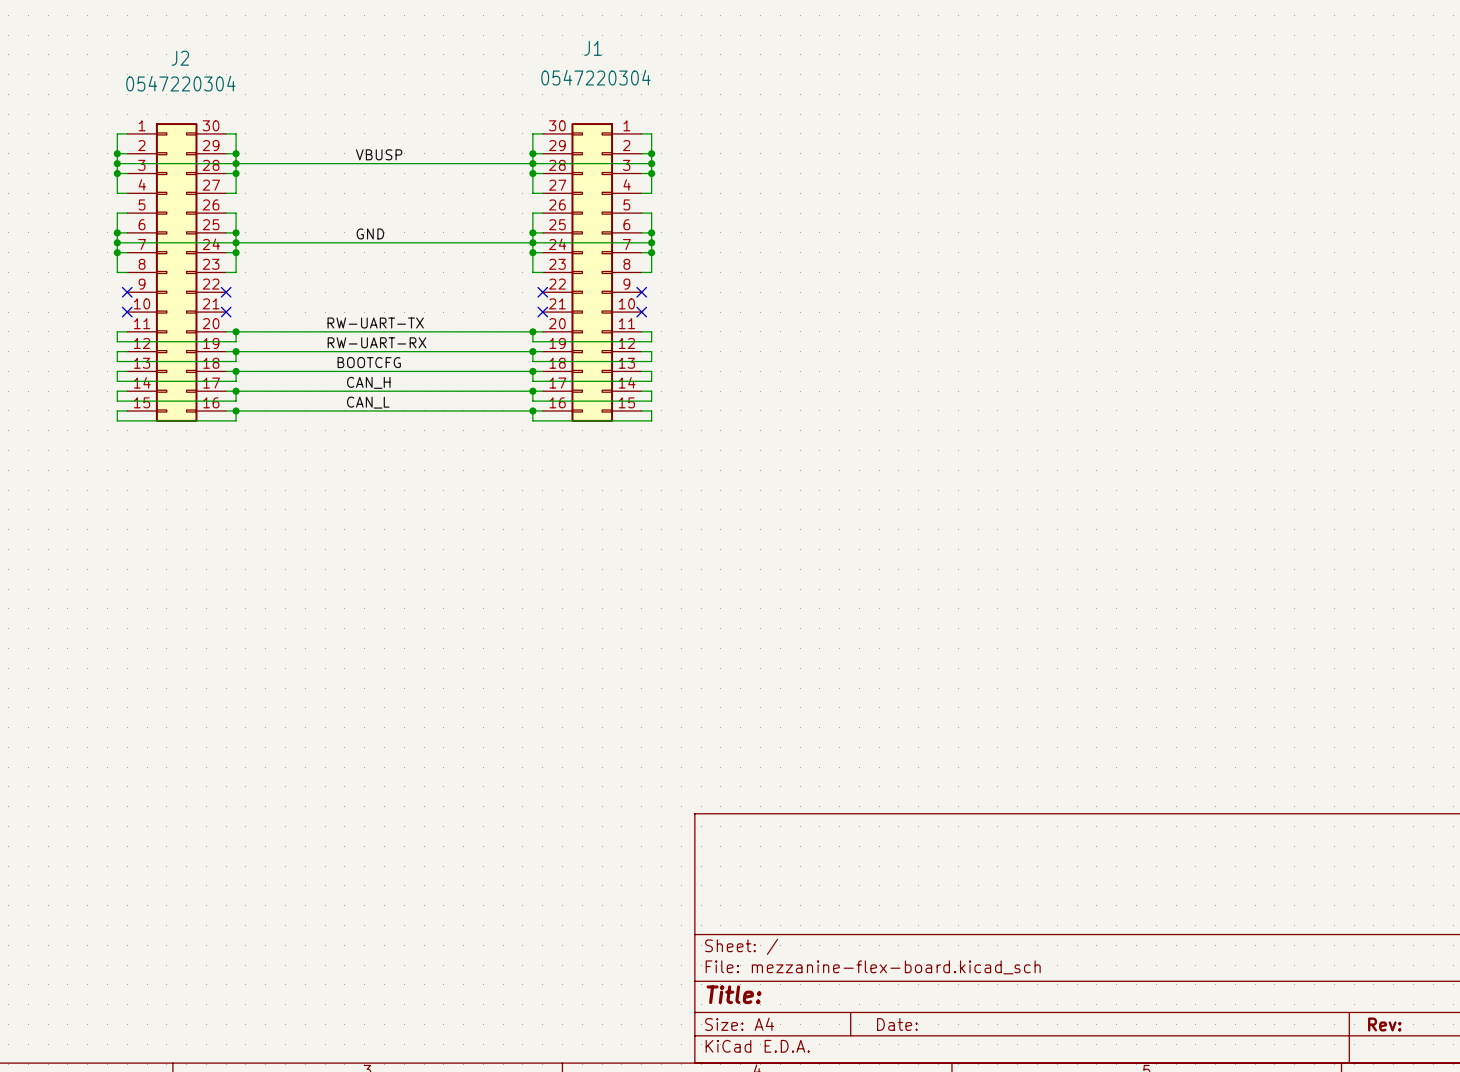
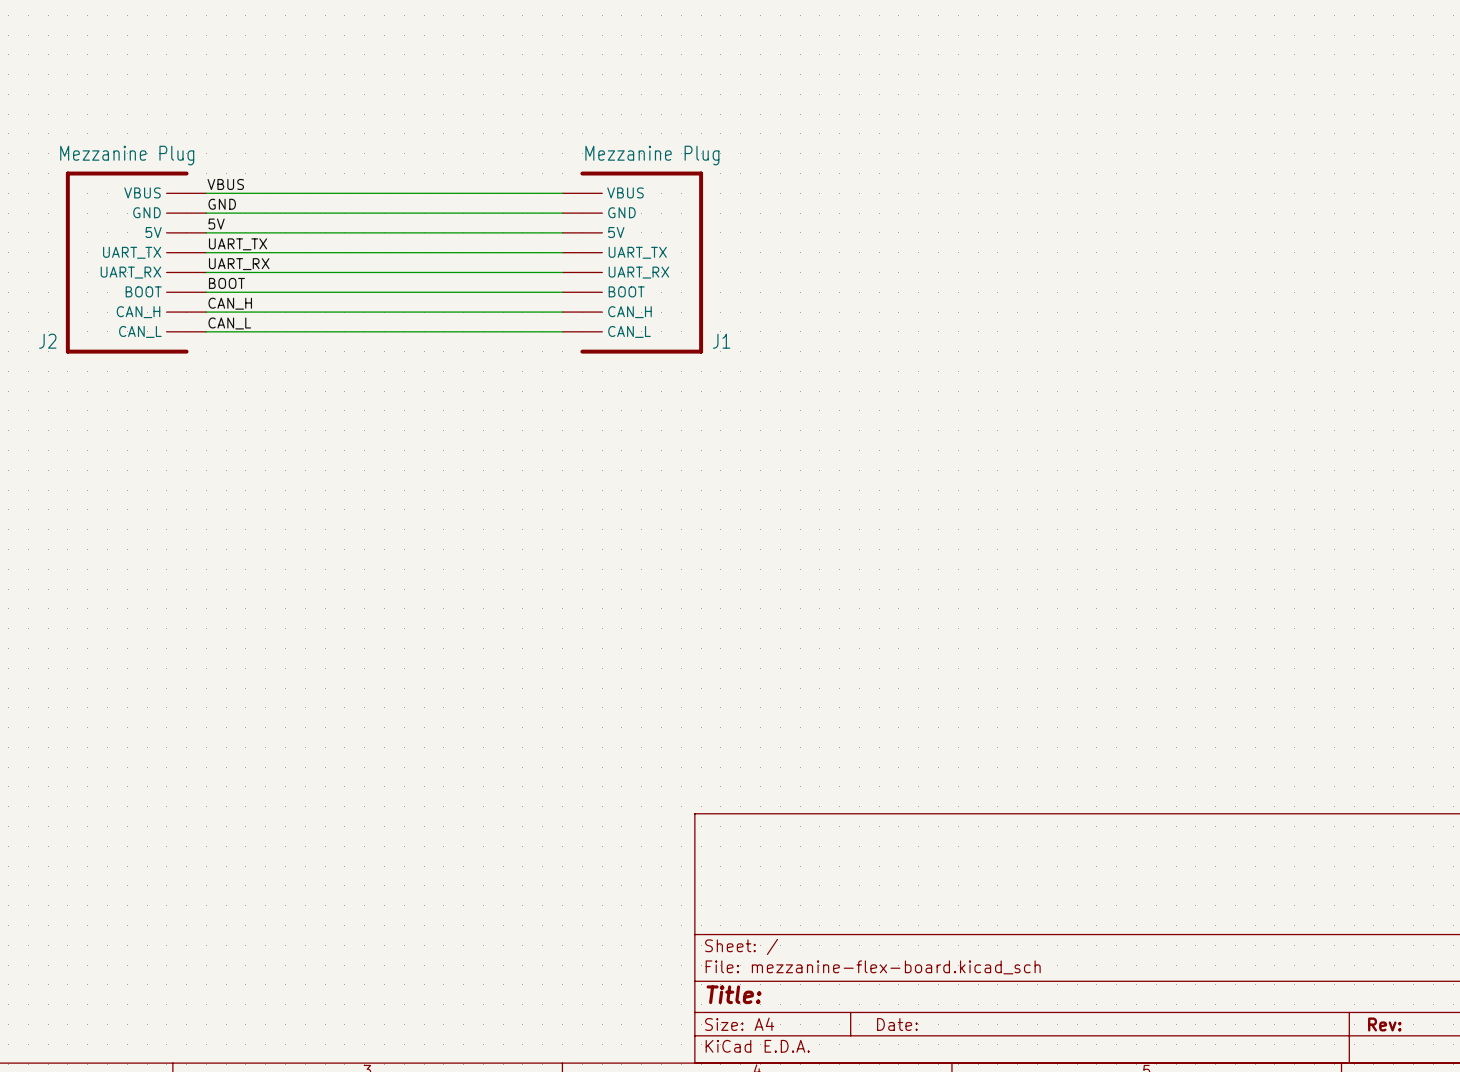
J1 name position: J1 (592, 48) -> J1 (721, 341)
J2 name position: J2 (180, 58) -> J2 (47, 341)
J1 value: 0547220304 (595, 77) -> Mezzanine Plug (652, 155)
J2 value: 0547220304 (180, 83) -> Mezzanine Plug (127, 155)
J2 symbol: [127, 123, 227, 422] -> [65, 171, 207, 354]
J1 symbol: [542, 123, 642, 422] -> [562, 171, 704, 354]
wire: (127, 133) (117, 133) (117, 193) (127, 193) -> none
wire: (226, 133) (236, 133) (236, 193) -> none
wire: (542, 133) (532, 133) (532, 193) -> (236, 193) (532, 193)
wire: (641, 133) (651, 133) (651, 193) (641, 193) -> none
wire: (117, 153) (127, 153) -> none
junction: (117, 153) -> none
wire: (226, 153) (236, 153) -> none
junction: (236, 153) -> none
wire: (532, 153) (542, 153) -> none
junction: (532, 153) -> none
wire: (641, 153) (651, 153) -> none
junction: (651, 153) -> none
label: VBUSP (379, 154) -> none
wire: (117, 163) (651, 163) -> none
junction: (117, 163) -> none
junction: (236, 163) -> none
junction: (532, 163) -> none
junction: (651, 163) -> none
junction: (117, 173) -> none
wire: (226, 173) (236, 173) -> none
junction: (236, 173) -> none
wire: (532, 173) (542, 173) -> none
junction: (532, 173) -> none
junction: (651, 173) -> none
label: none -> VBUS (225, 184)
wire: (127, 213) (117, 213) (117, 272) (127, 272) -> none
wire: (236, 213) (236, 272) -> (236, 213) (532, 213)
wire: (532, 213) (532, 272) -> (236, 272) (532, 272)
wire: (641, 213) (651, 213) (651, 272) (641, 272) -> none
label: none -> 5V (216, 224)
wire: (117, 232) (127, 232) -> none
junction: (117, 232) -> none
wire: none -> (236, 232) (532, 232)
junction: (236, 232) -> none
junction: (532, 232) -> none
wire: (641, 232) (651, 232) -> none
junction: (651, 232) -> none
label position: GND (370, 233) -> GND (222, 204)
wire: (117, 242) (651, 242) -> none
junction: (117, 242) -> none
junction: (236, 242) -> none
junction: (532, 242) -> none
junction: (651, 242) -> none
label: none -> UART_TX (238, 244)
junction: (117, 252) -> none
wire: none -> (236, 252) (532, 252)
junction: (236, 252) -> none
junction: (532, 252) -> none
wire: (641, 252) (651, 252) -> none
junction: (651, 252) -> none
label: none -> UART_RX (239, 264)
label: none -> BOOT (226, 283)
no-connect mark: (127, 292) -> none
wire: none -> (206, 292) (562, 292)
no-connect mark: (226, 292) -> none
no-connect mark: (542, 292) -> none
no-connect mark: (641, 292) -> none
no-connect mark: (127, 312) -> none
wire: none -> (206, 312) (562, 312)
no-connect mark: (226, 312) -> none
no-connect mark: (542, 312) -> none
no-connect mark: (641, 312) -> none
label: RW-UART-TX (375, 323) -> none
wire: (127, 331) (117, 331) (117, 341) (236, 341) (236, 331) -> none
junction: (236, 331) -> none
wire: (532, 331) (532, 341) (651, 341) (651, 331) (641, 331) -> none
junction: (532, 331) -> none
label: RW-UART-RX (377, 342) -> none
wire: (127, 351) (117, 351) (117, 361) (236, 361) (236, 351) -> none
wire: (226, 351) (542, 351) -> none
junction: (236, 351) -> none
wire: (532, 351) (532, 361) (651, 361) (651, 351) (641, 351) -> none
junction: (532, 351) -> none
label: BOOTCFG (369, 362) -> none
wire: (127, 371) (117, 371) (117, 381) (236, 381) (236, 371) -> none
wire: (226, 371) (542, 371) -> none
junction: (236, 371) -> none
wire: (532, 371) (532, 381) (651, 381) (651, 371) (641, 371) -> none
junction: (532, 371) -> none
label position: CAN_H (368, 382) -> CAN_H (230, 303)
wire: (127, 391) (117, 391) (117, 401) (236, 401) (236, 391) -> none
wire: (226, 391) (542, 391) -> none
junction: (236, 391) -> none
wire: (532, 391) (532, 401) (651, 401) (651, 391) (641, 391) -> none
junction: (532, 391) -> none
label position: CAN_L (368, 402) -> CAN_L (229, 323)
wire: (127, 410) (117, 410) (117, 420) (236, 420) (236, 410) -> none
wire: (226, 410) (542, 410) -> none
junction: (236, 410) -> none
wire: (532, 410) (532, 420) (651, 420) (651, 410) (641, 410) -> none
junction: (532, 410) -> none

